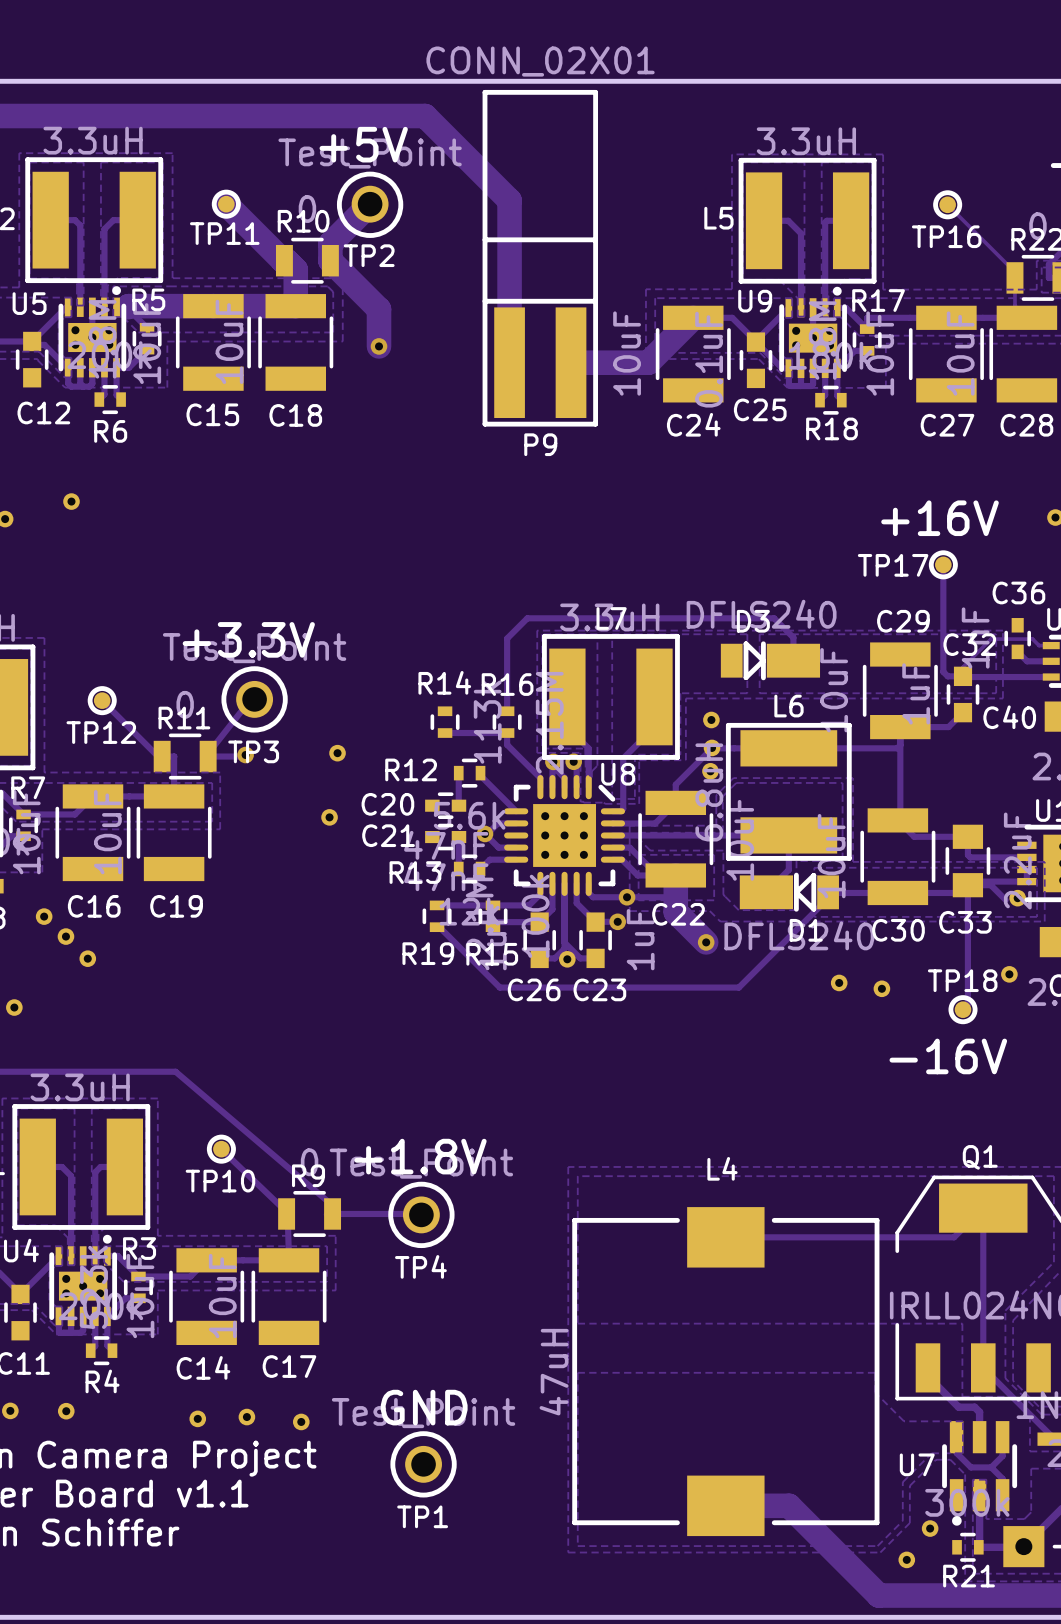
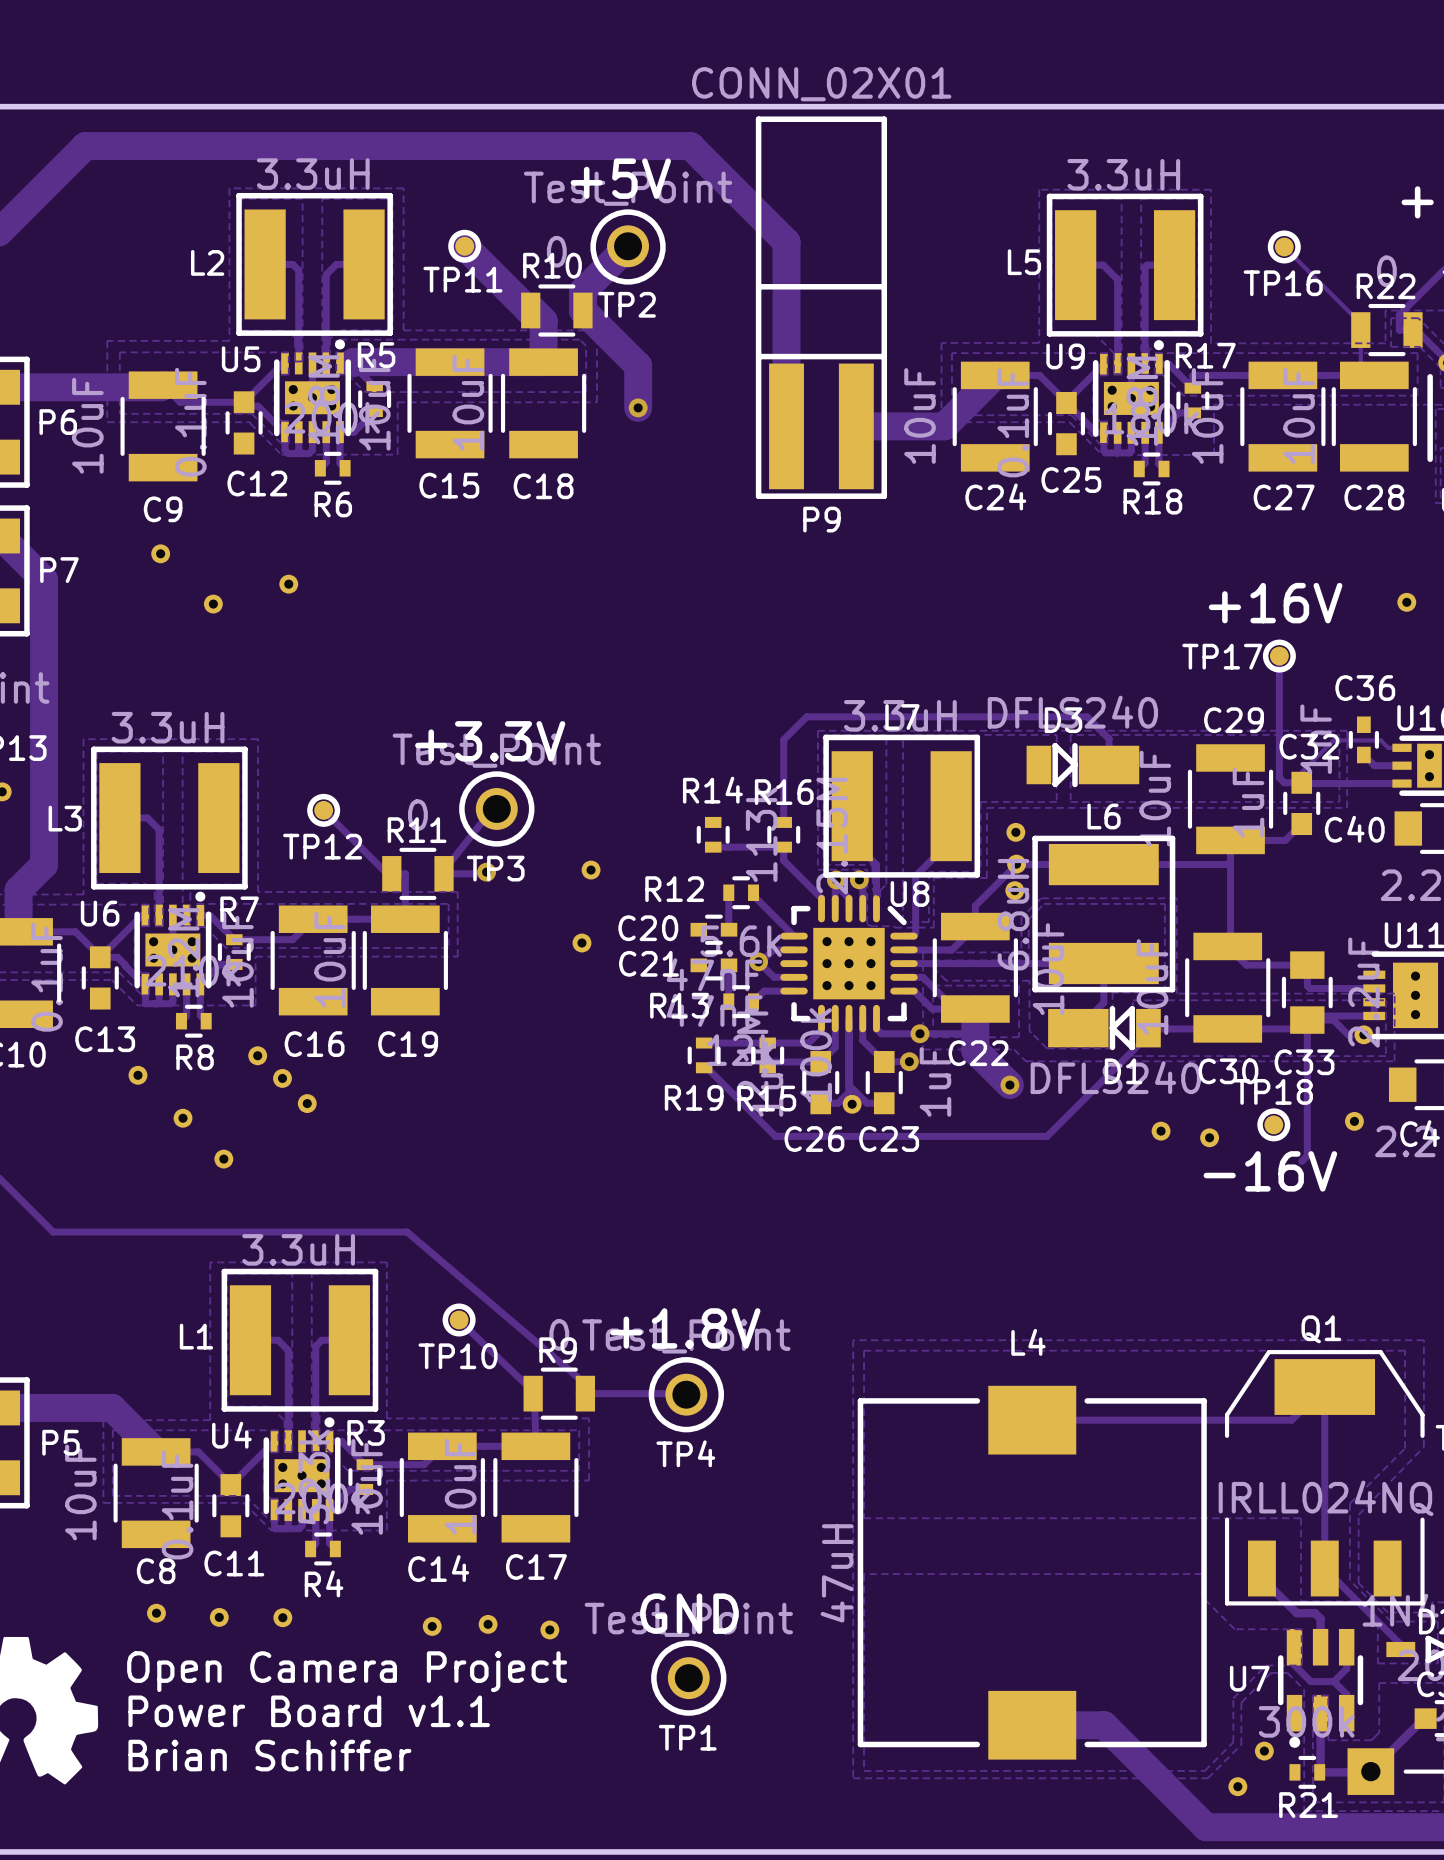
TP18 position: (963, 1009) -> (1273, 1124)
text position: -16V (948, 1056) -> -16V (1270, 1171)

